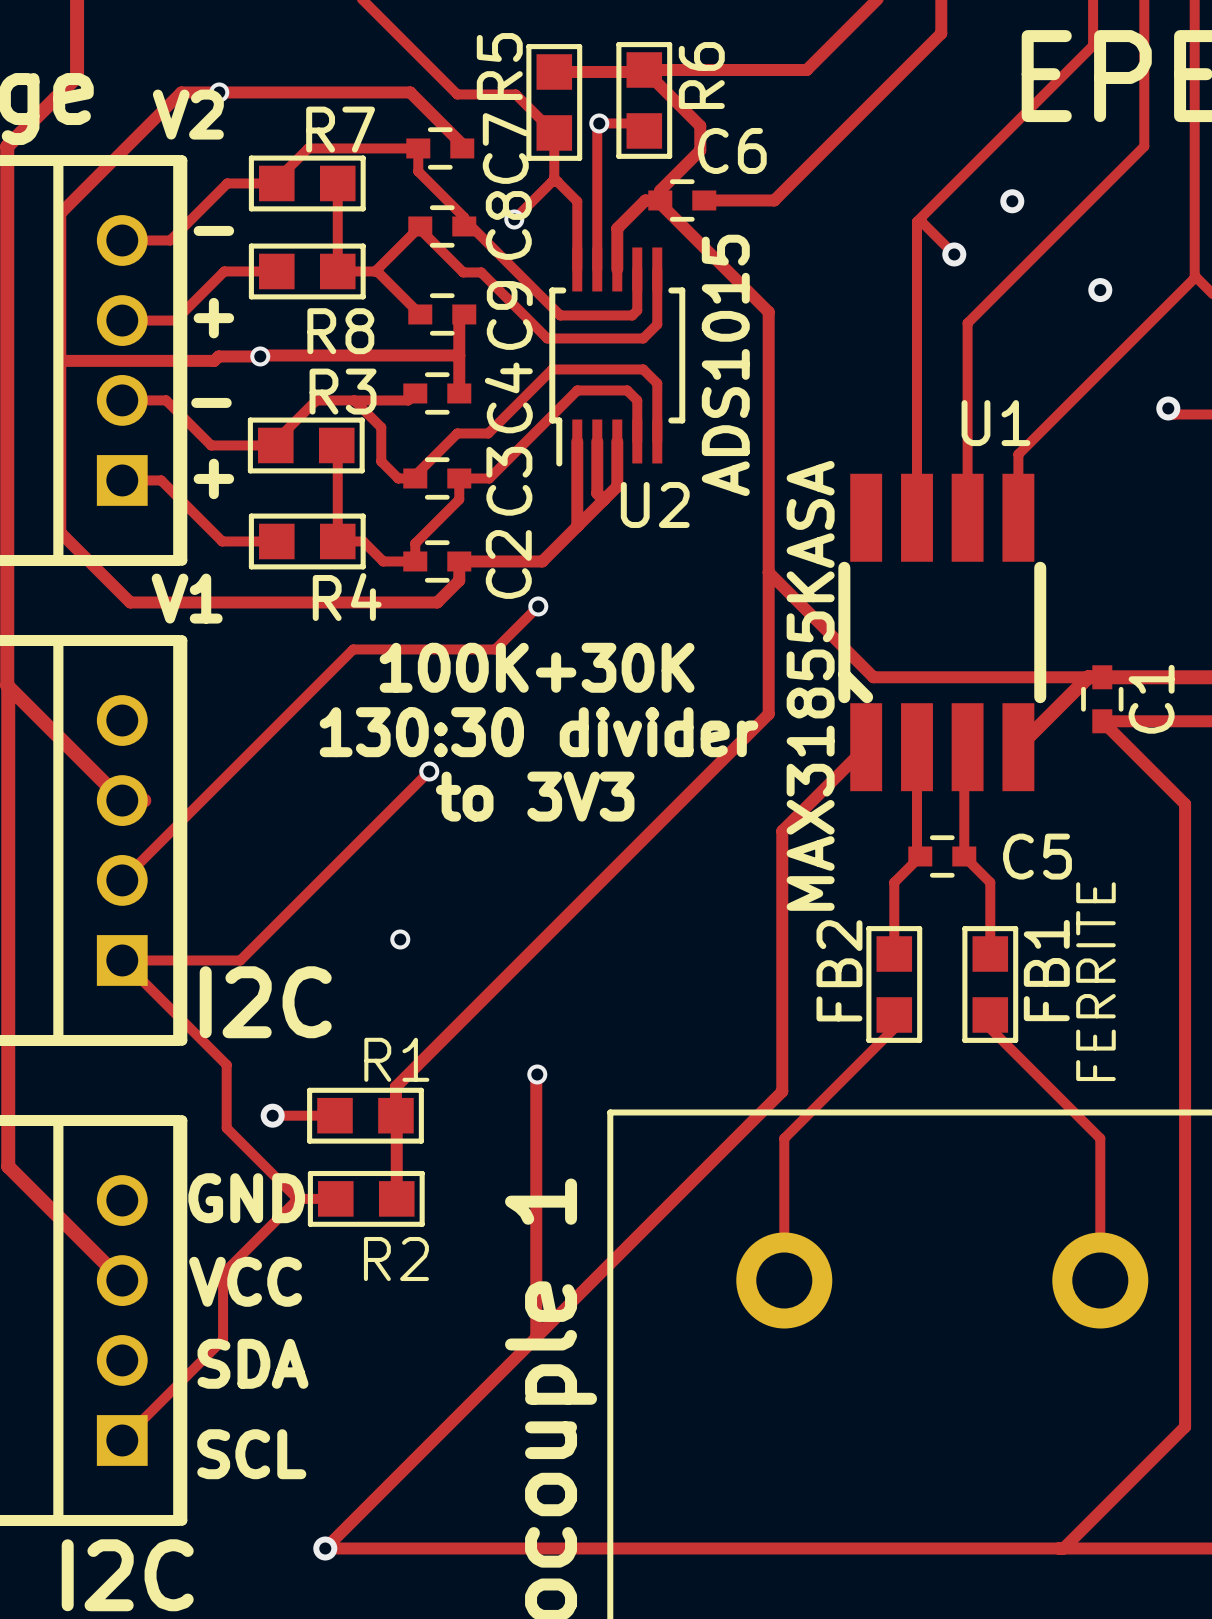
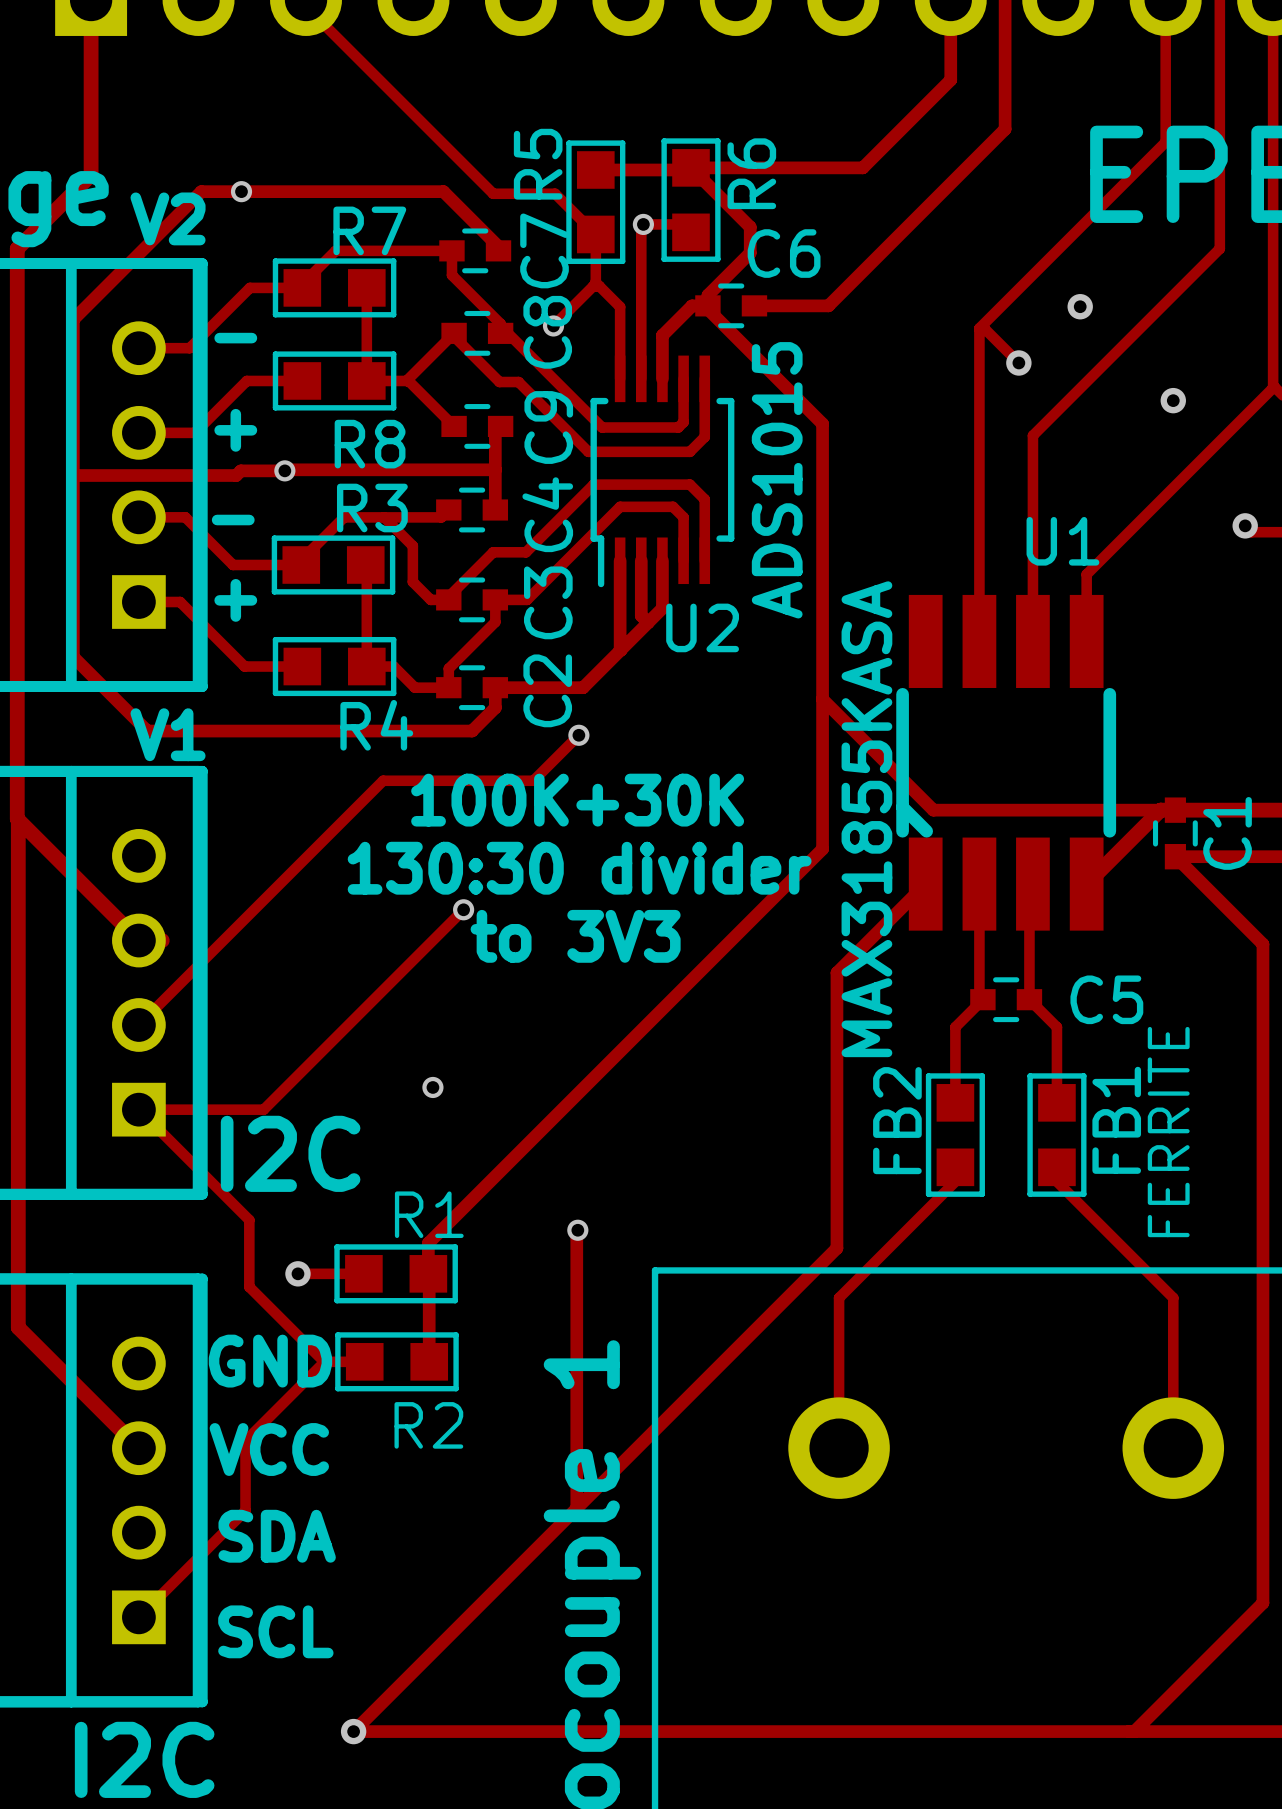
text position: V2 (188, 114) -> V2 (168, 218)
text position: V1 (187, 598) -> V1 (168, 734)

